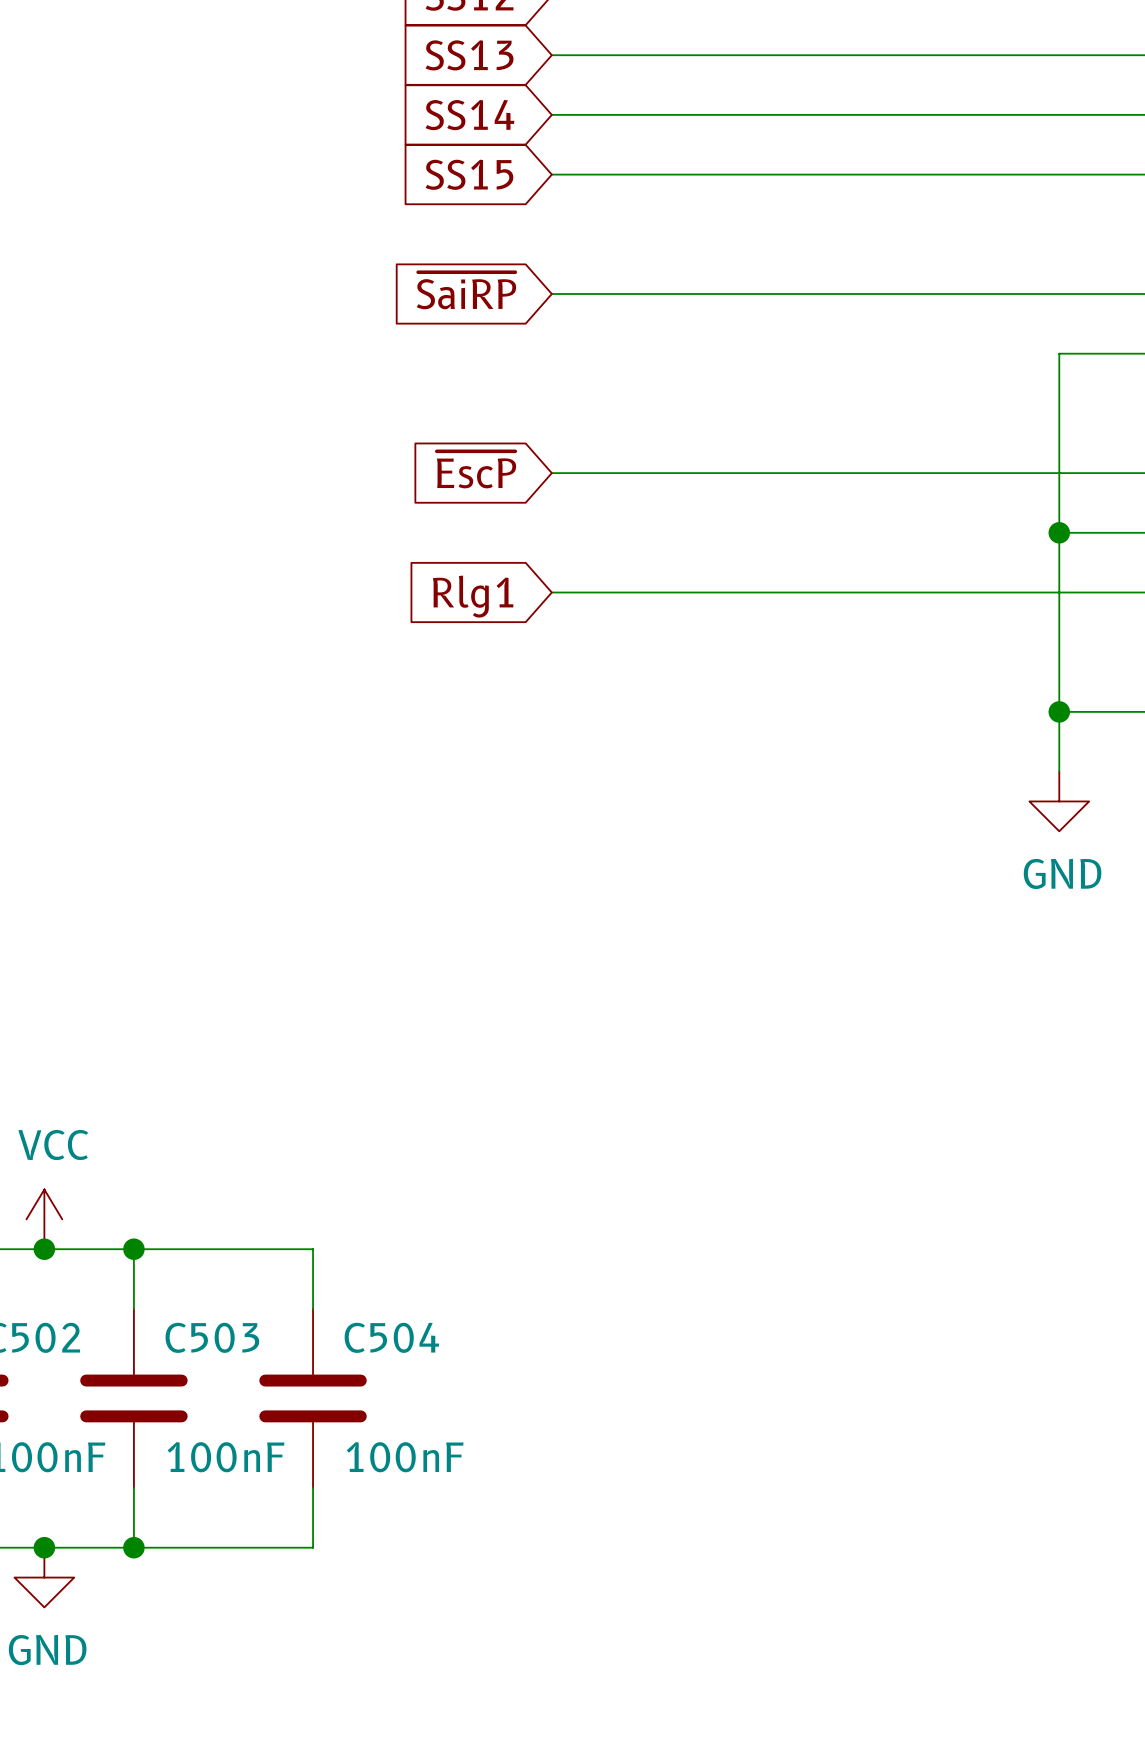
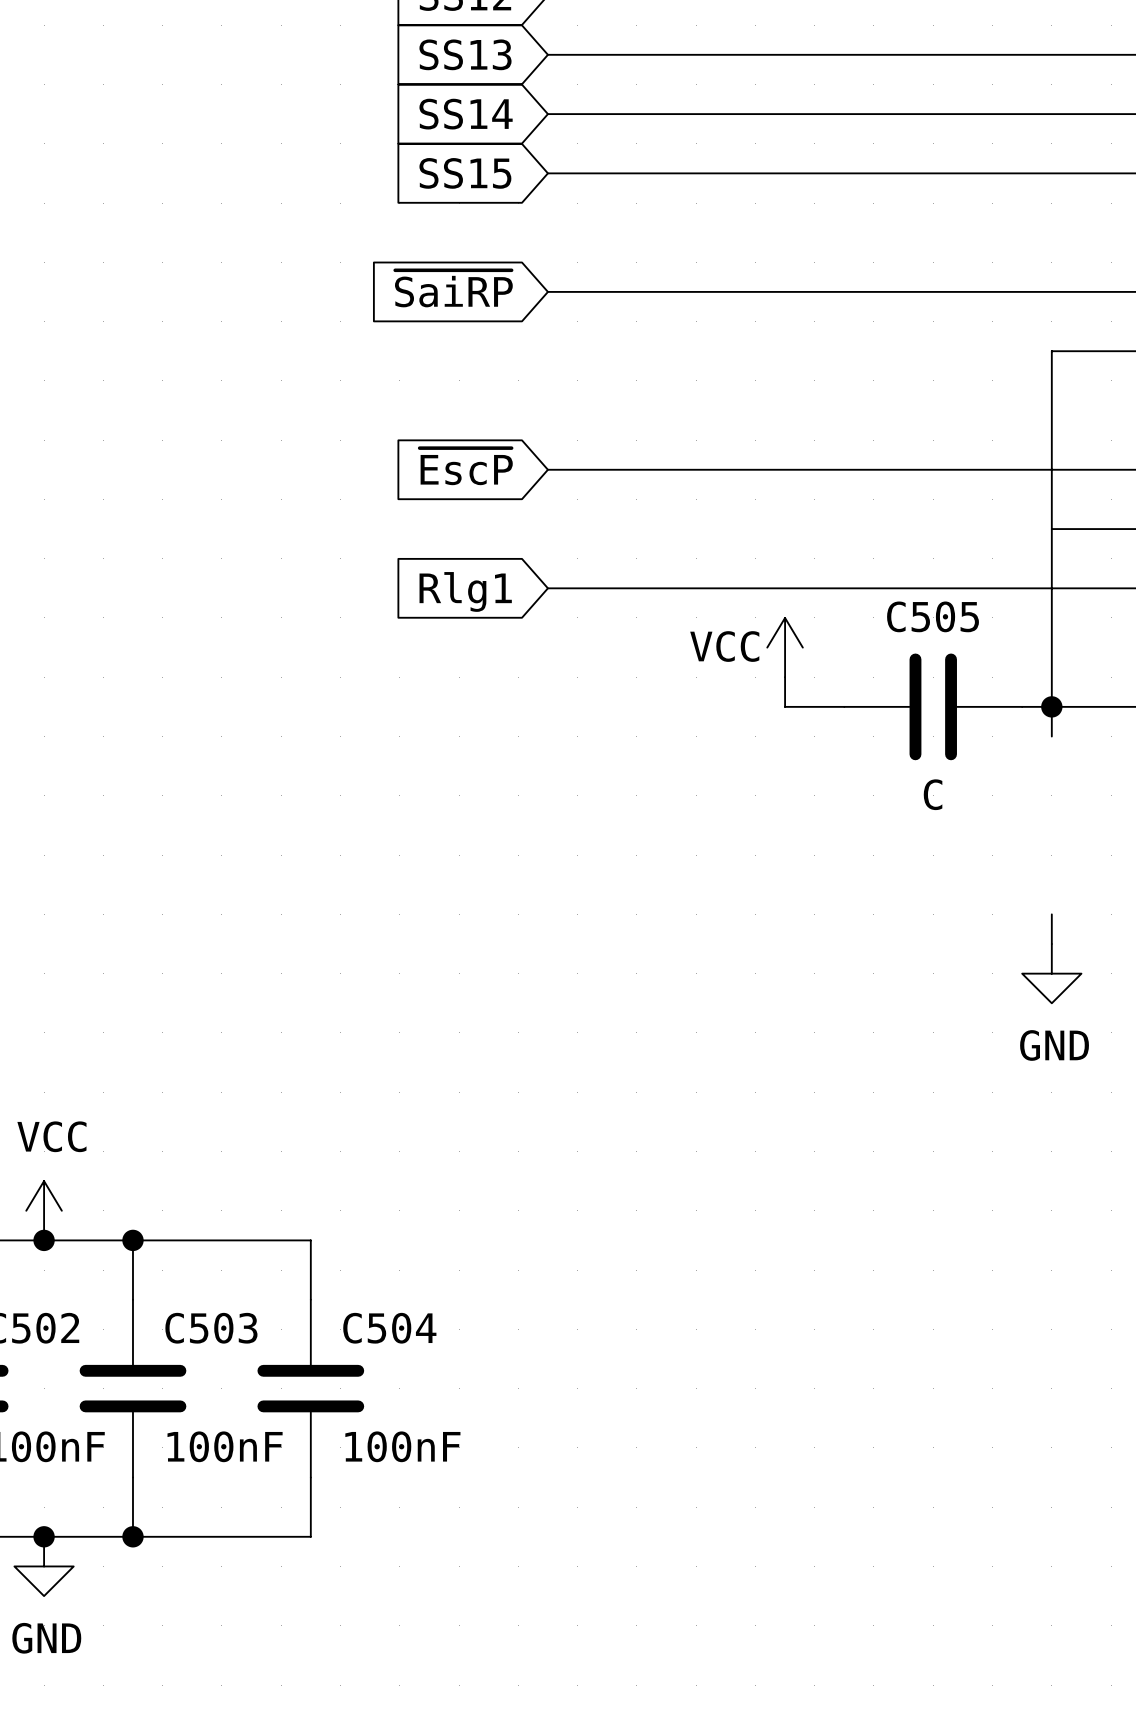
junction: (1059, 532) -> none
power symbol: none -> VCC (785, 647)
wire: none -> (785, 677) (785, 706) (844, 706)
C505: none -> C (933, 706)
wire: none -> (1022, 706) (1051, 706)
wire: (1059, 741) (1059, 771) -> (1051, 914) (1051, 944)
power symbol position: GND (1059, 801) -> GND (1051, 973)

